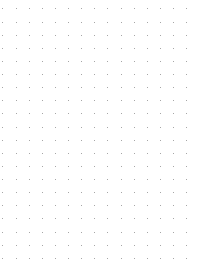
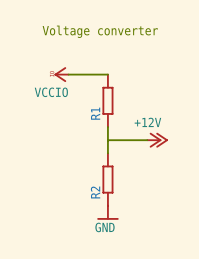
text: none -> Voltage converter (100, 31)
power symbol: none -> VCCIO (61, 74)
wire: none -> (68, 74) (107, 74)
R1: none -> (107, 100)
wire: none -> (107, 127) (107, 153)
wire: none -> (107, 140) (147, 140)
power symbol: none -> +12V (157, 140)
R2: none -> (107, 179)
power symbol: none -> GND (107, 212)

